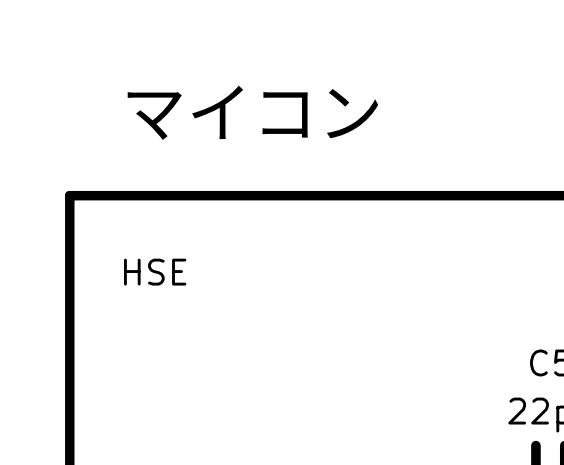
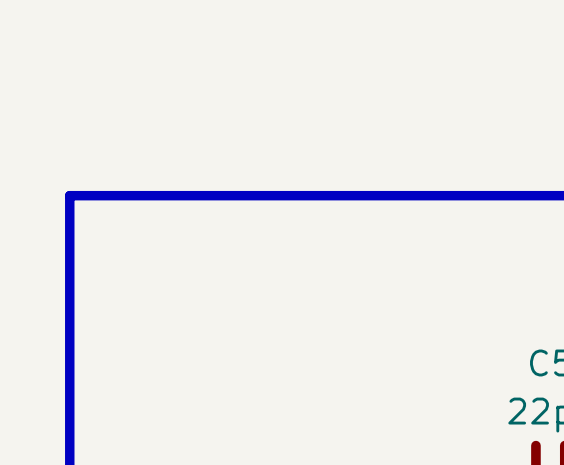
text: マイコン (252, 112) -> none
text: HSE (155, 272) -> none

